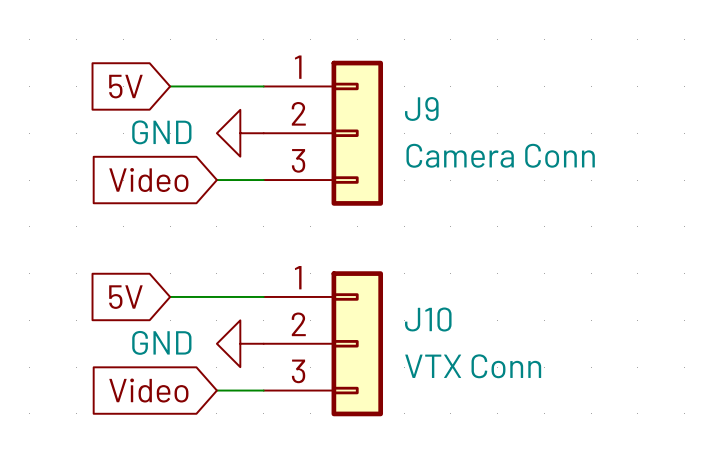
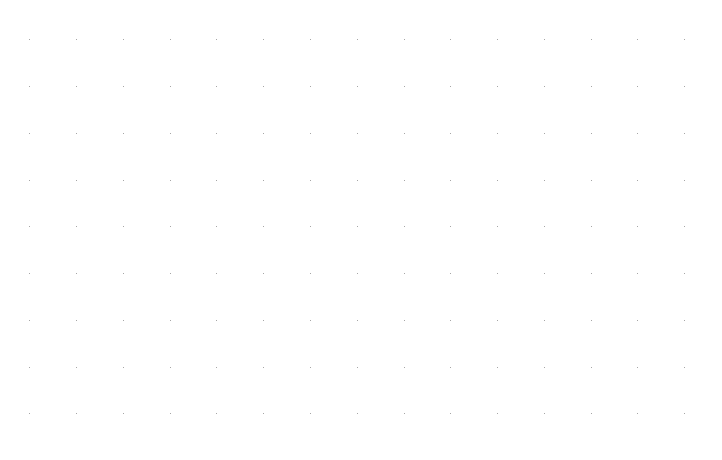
global label: 5V (125, 86) -> none
wire: (170, 86) (263, 86) -> none
power symbol: GND (240, 133) -> none
J9: Camera Conn (323, 133) -> none
global label: Video (148, 180) -> none
wire: (216, 180) (263, 180) -> none
wire: (170, 296) (263, 296) -> none
global label: 5V (125, 297) -> none
power symbol: GND (240, 343) -> none
J10: VTX Conn (323, 343) -> none
global label: Video (148, 390) -> none
wire: (216, 390) (263, 390) -> none

